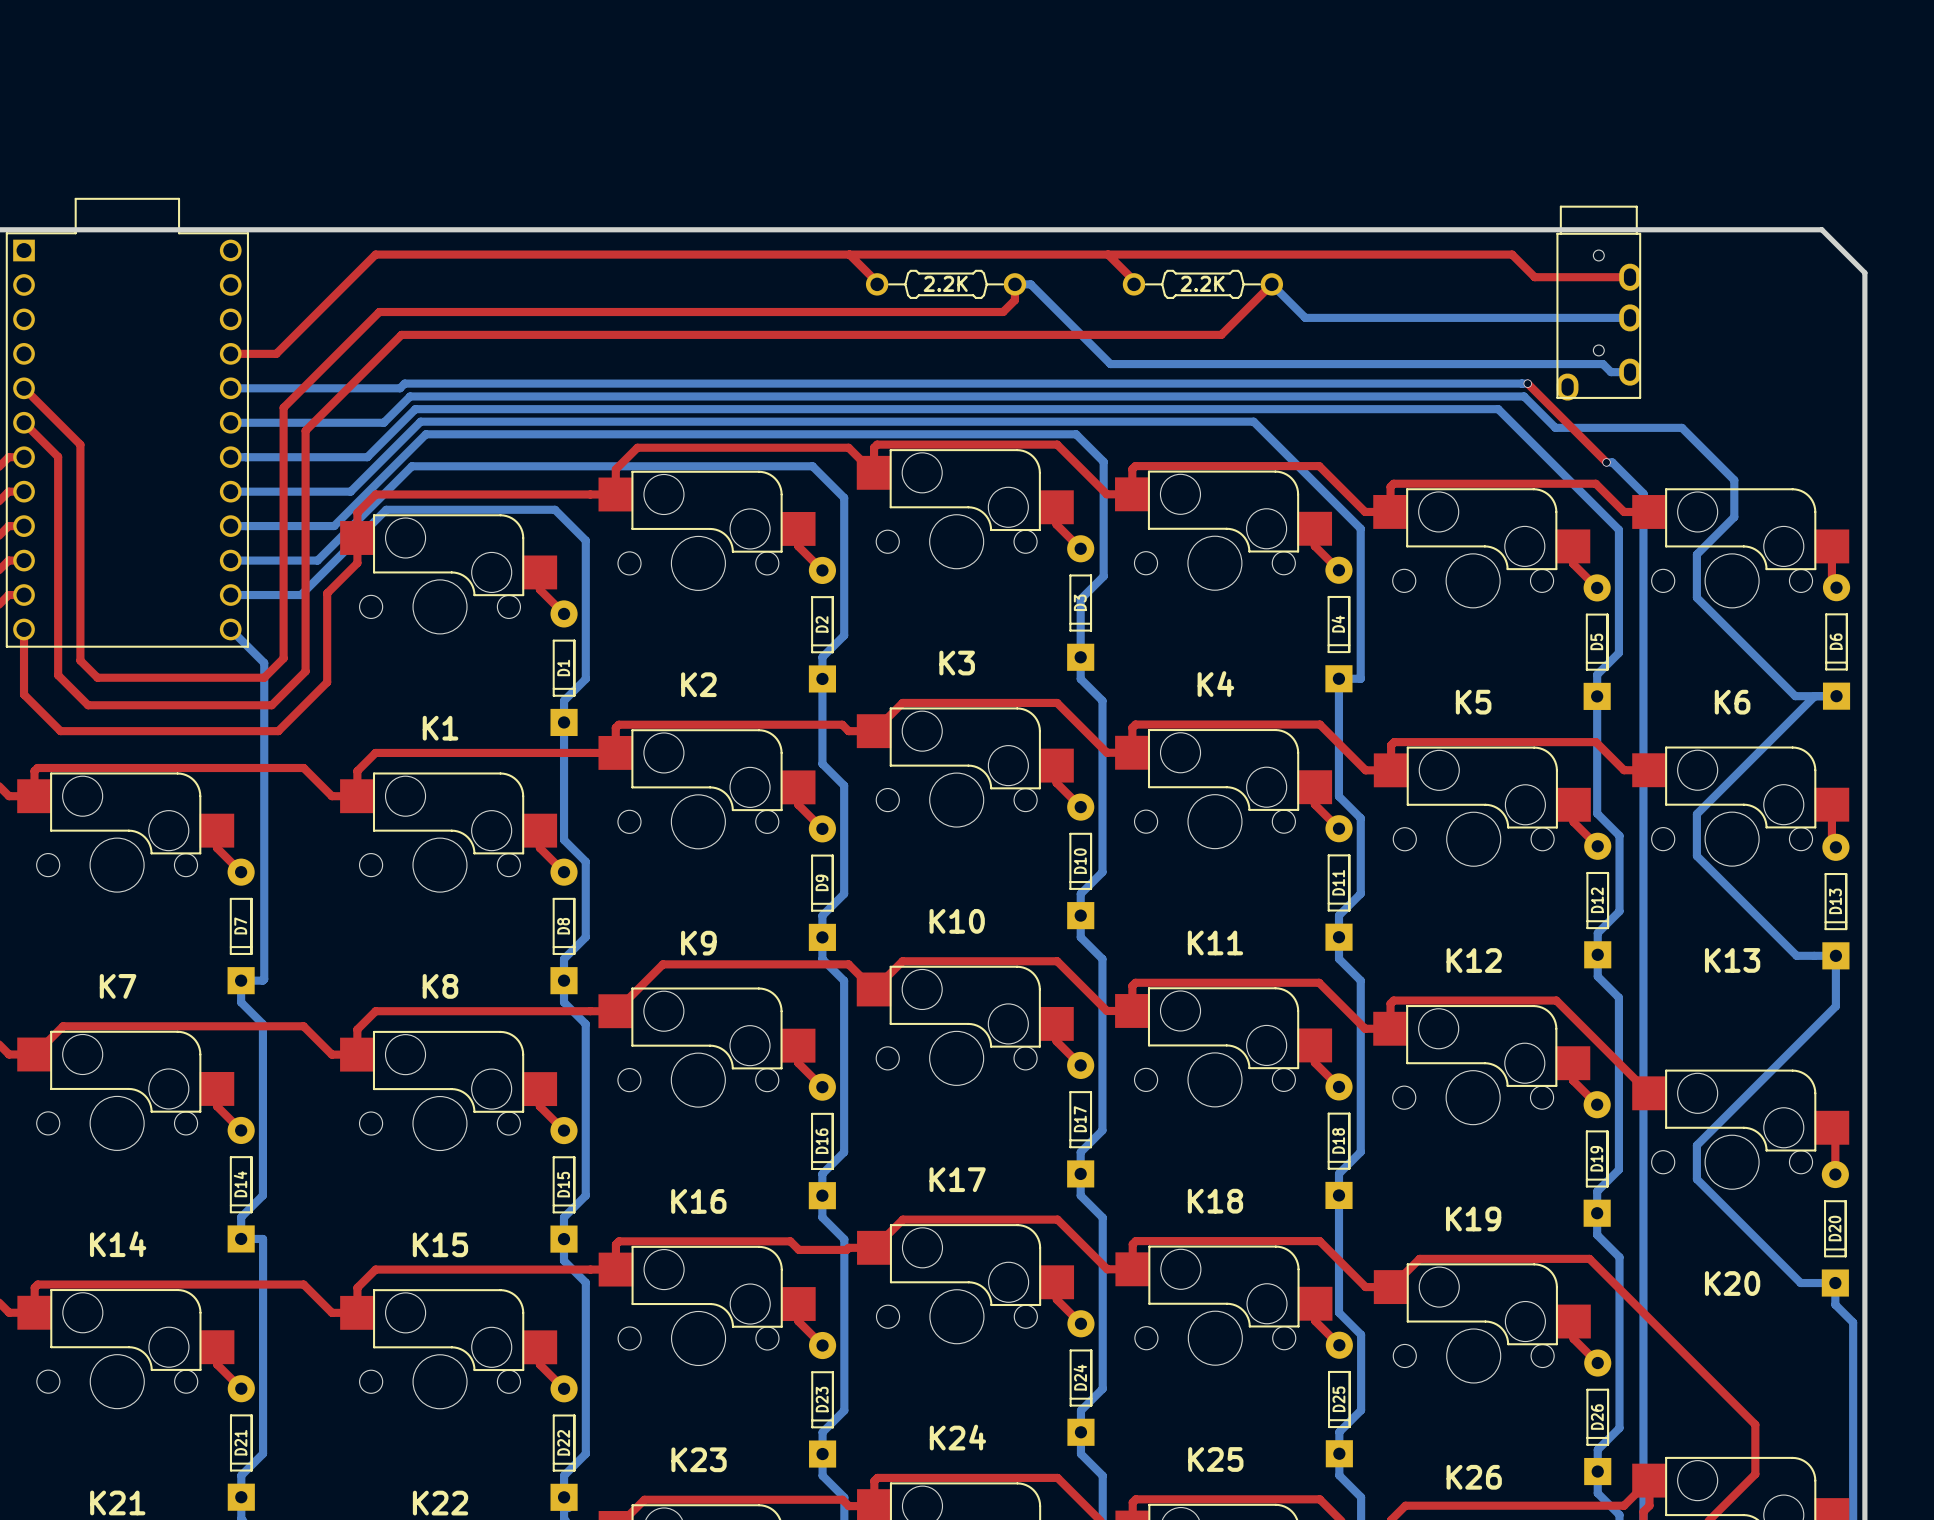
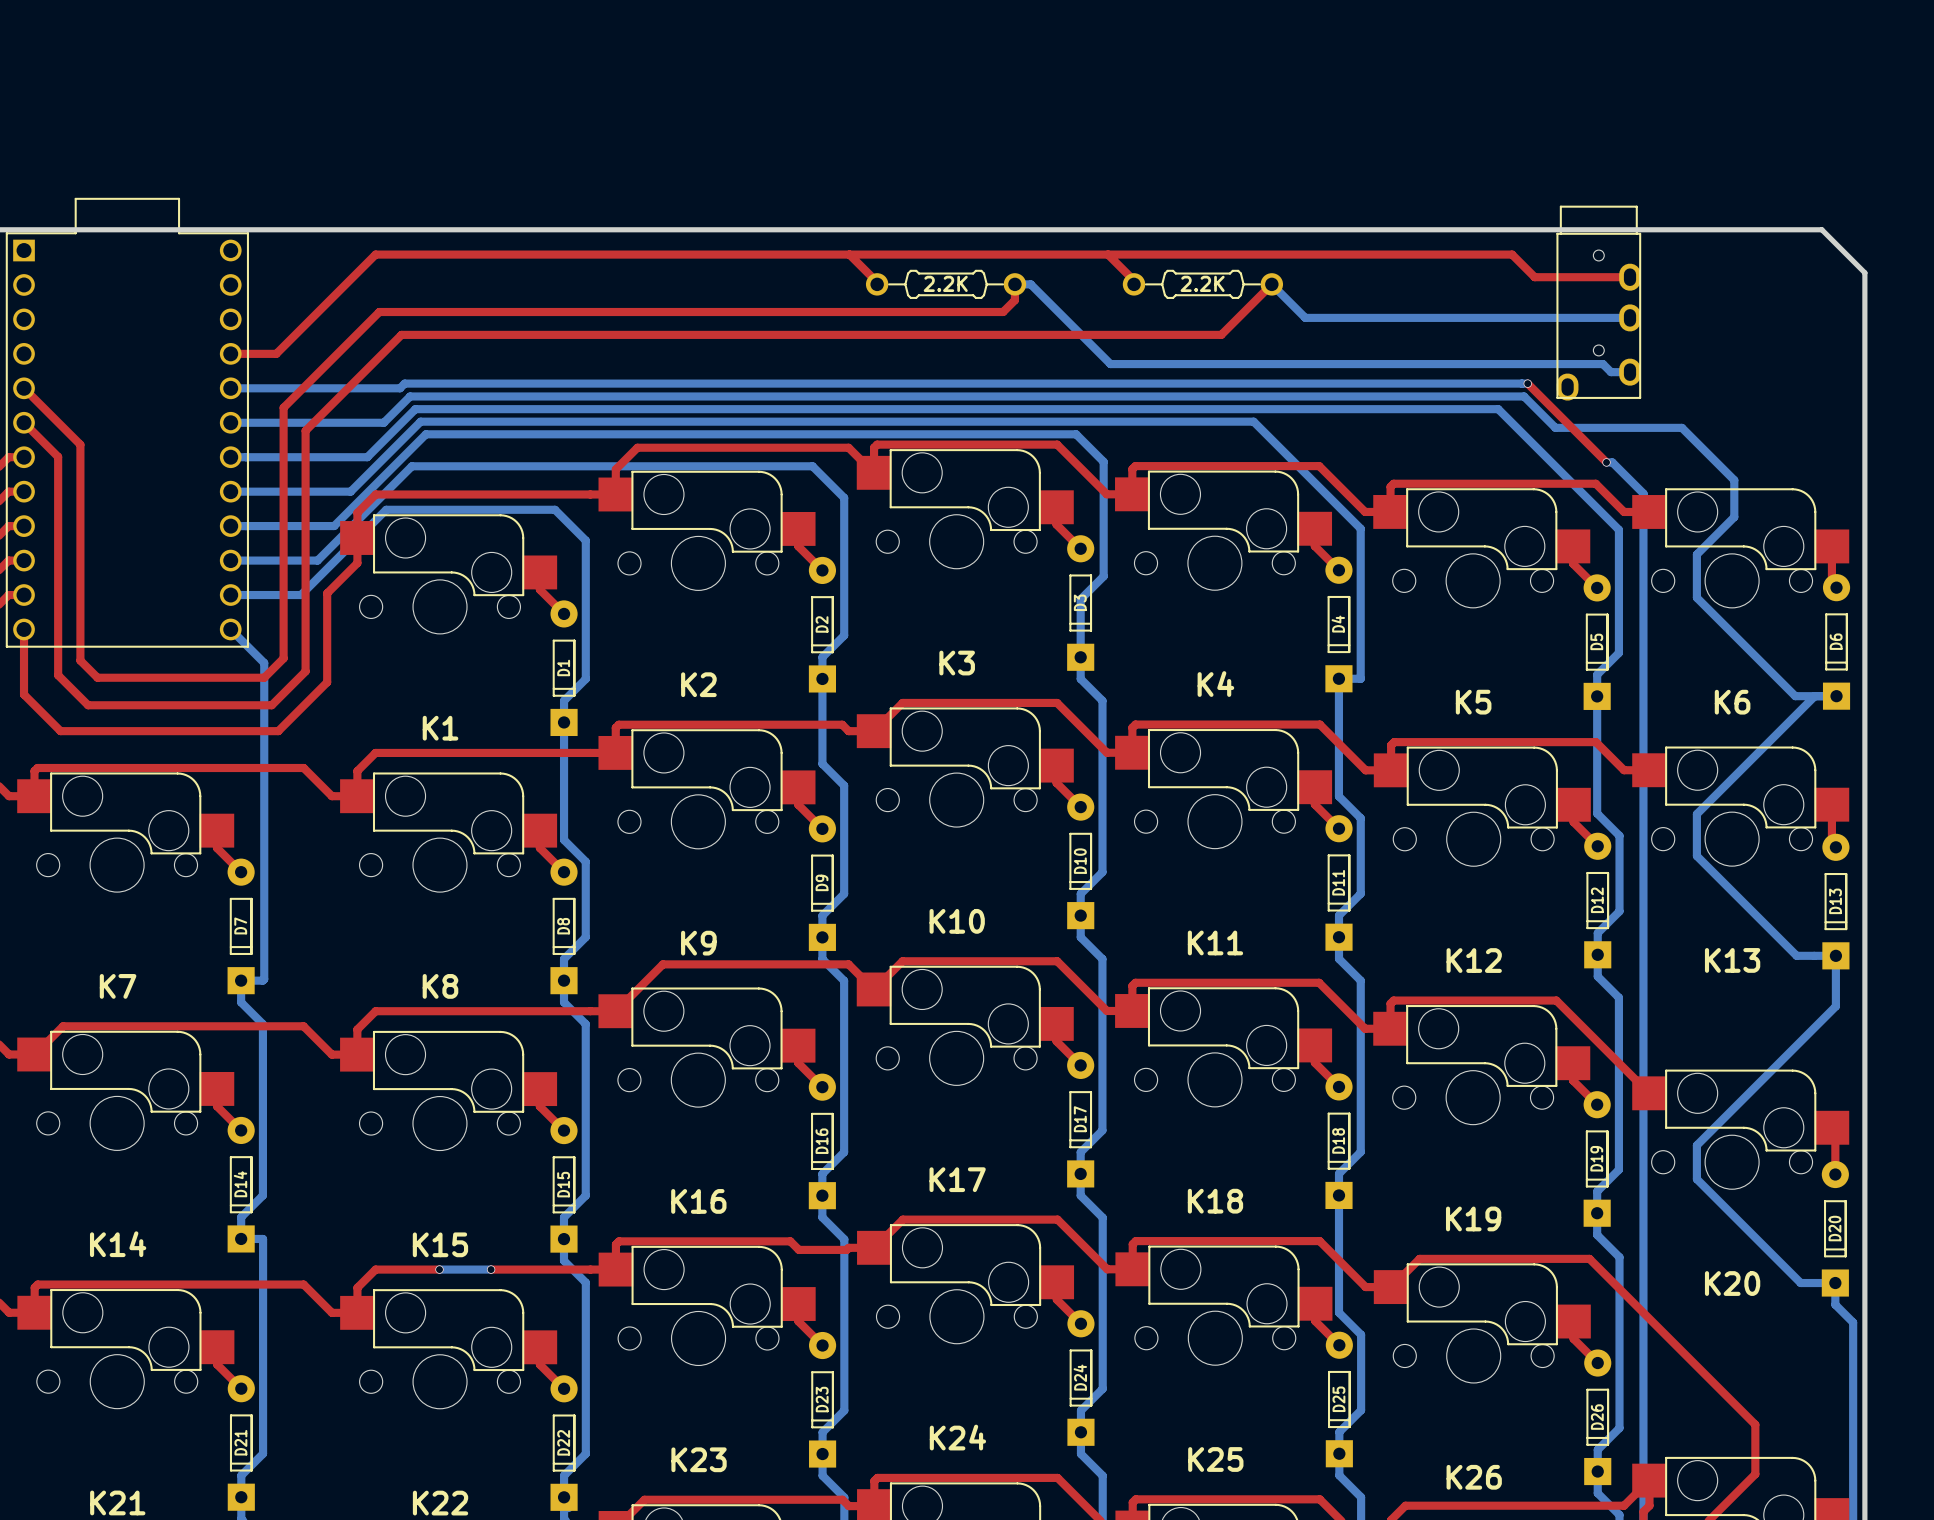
top track: (439, 1269) (491, 1269) -> none
bottom track: none -> (439, 1269) (491, 1269)
via: none -> (439, 1269)
via: none -> (491, 1269)

